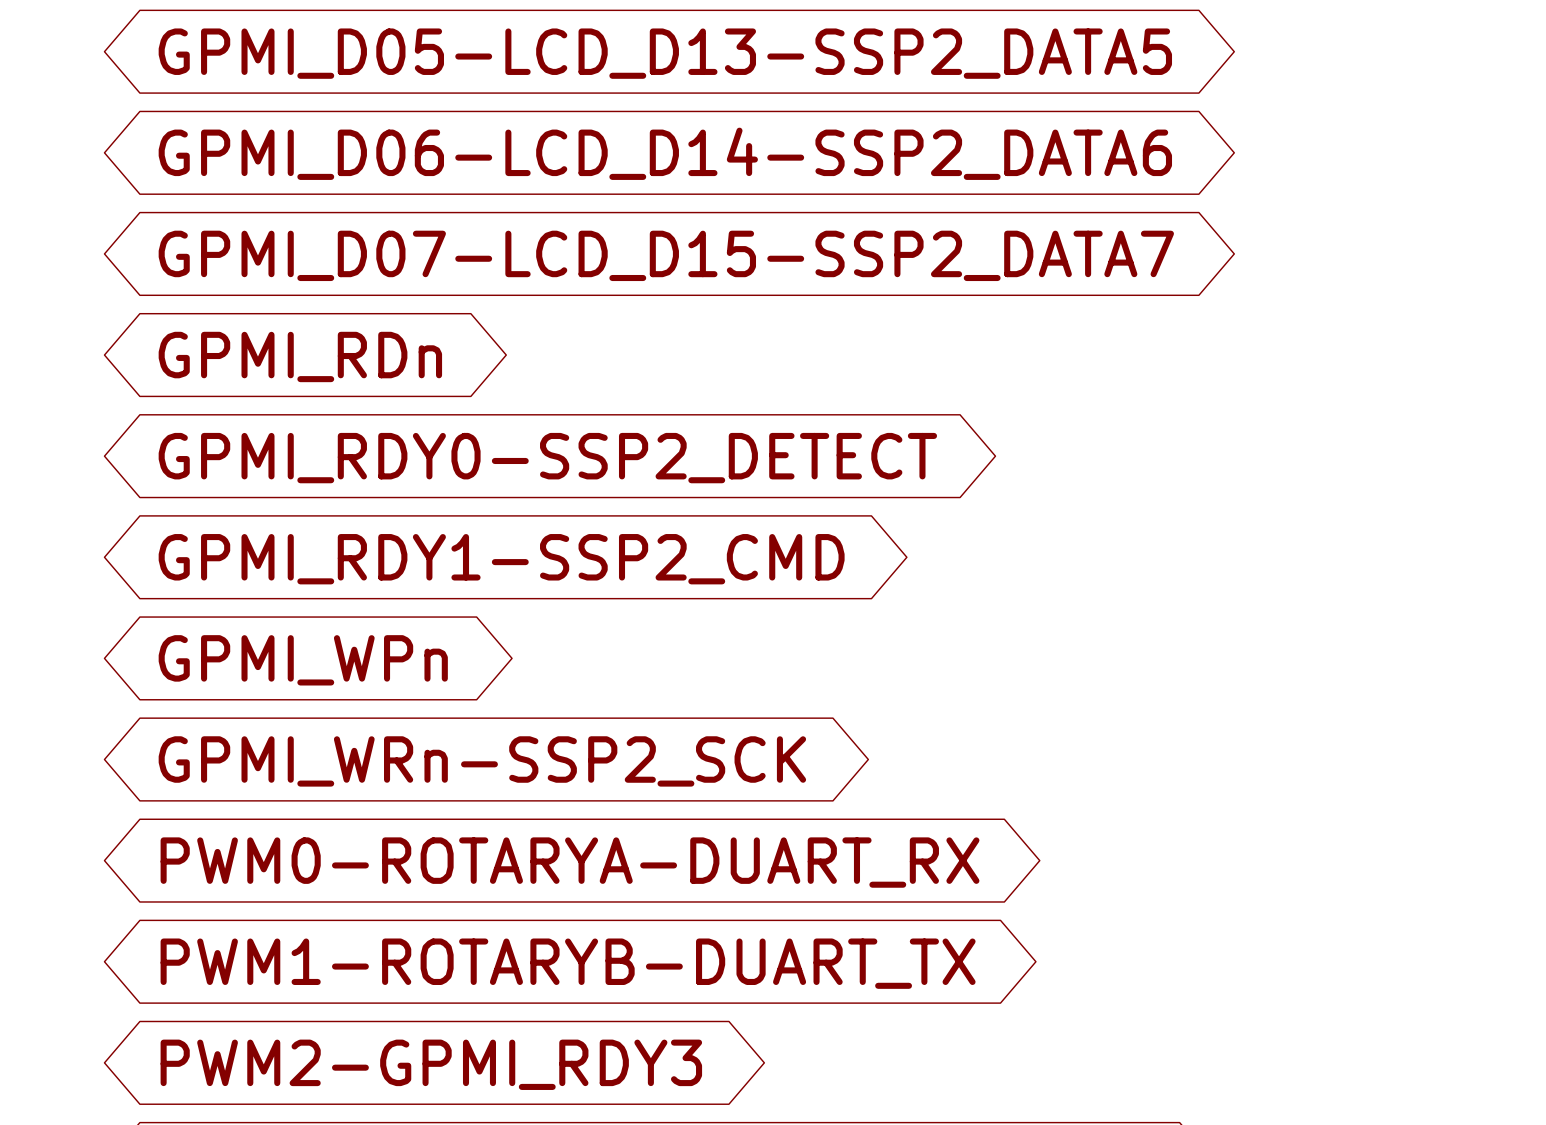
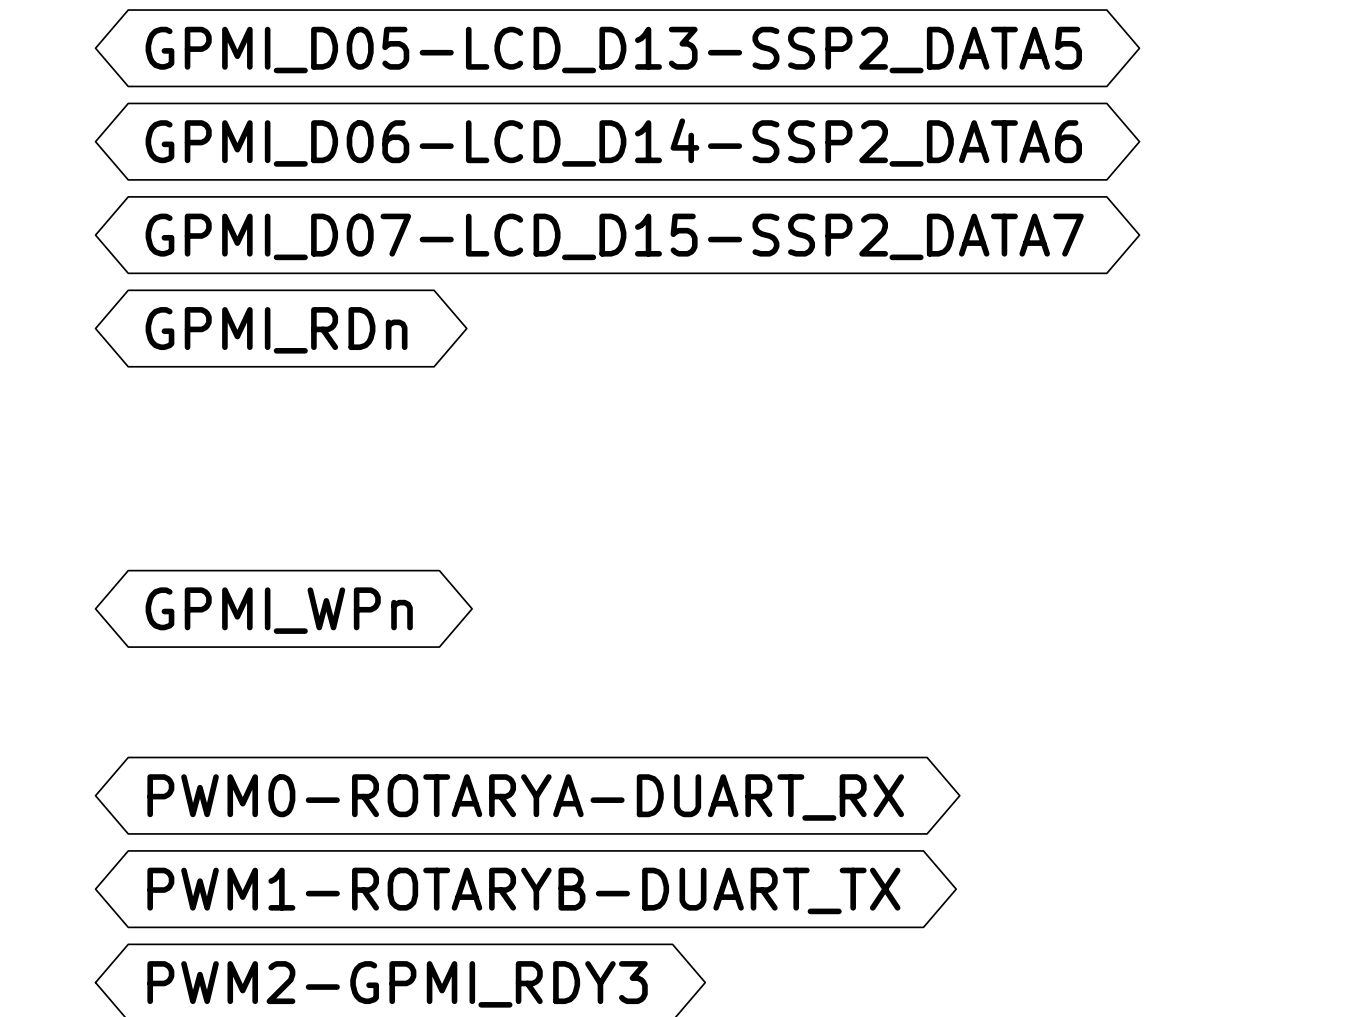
global label: GPMI_RDY0-SSP2_DETECT (547, 458) -> none
global label: GPMI_RDY1-SSP2_CMD (501, 559) -> none
global label: GPMI_WRn-SSP2_SCK (482, 761) -> none

